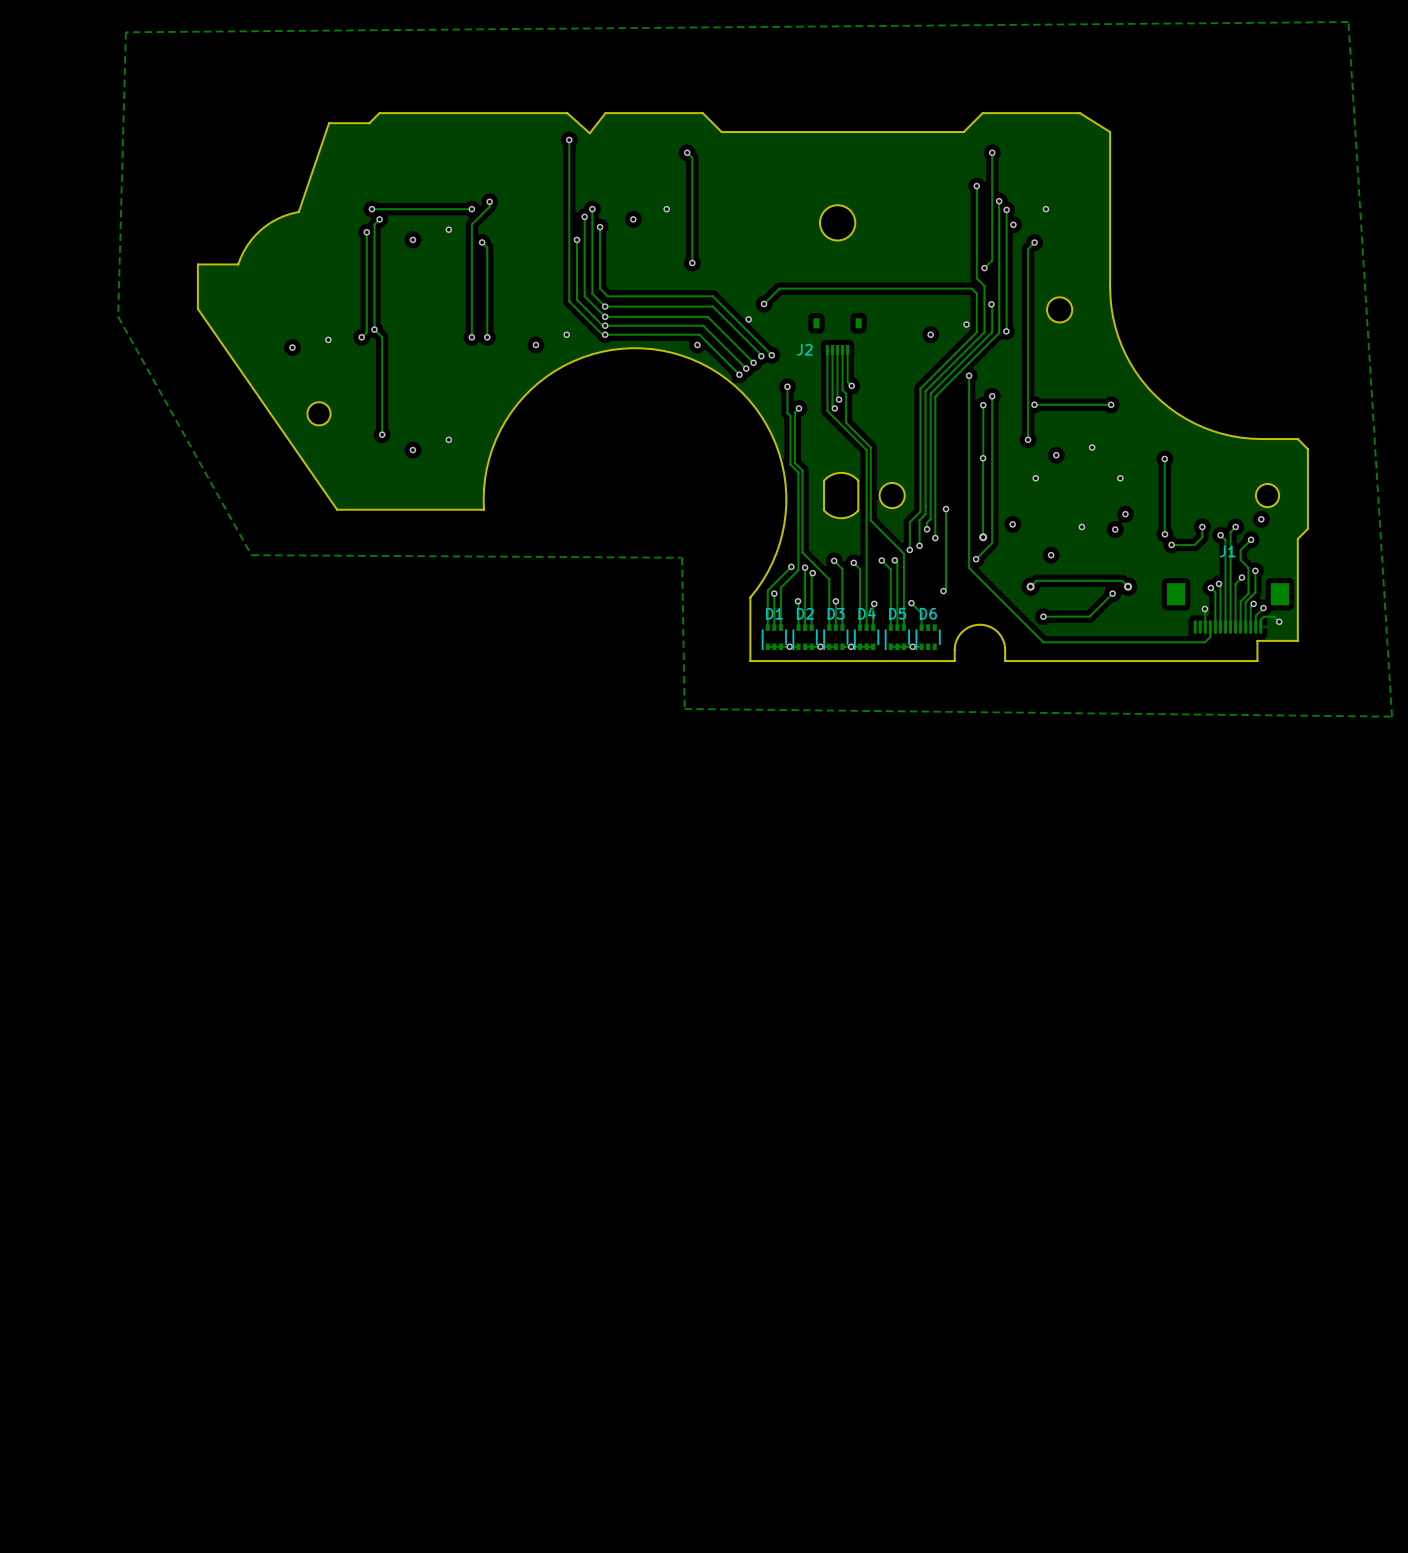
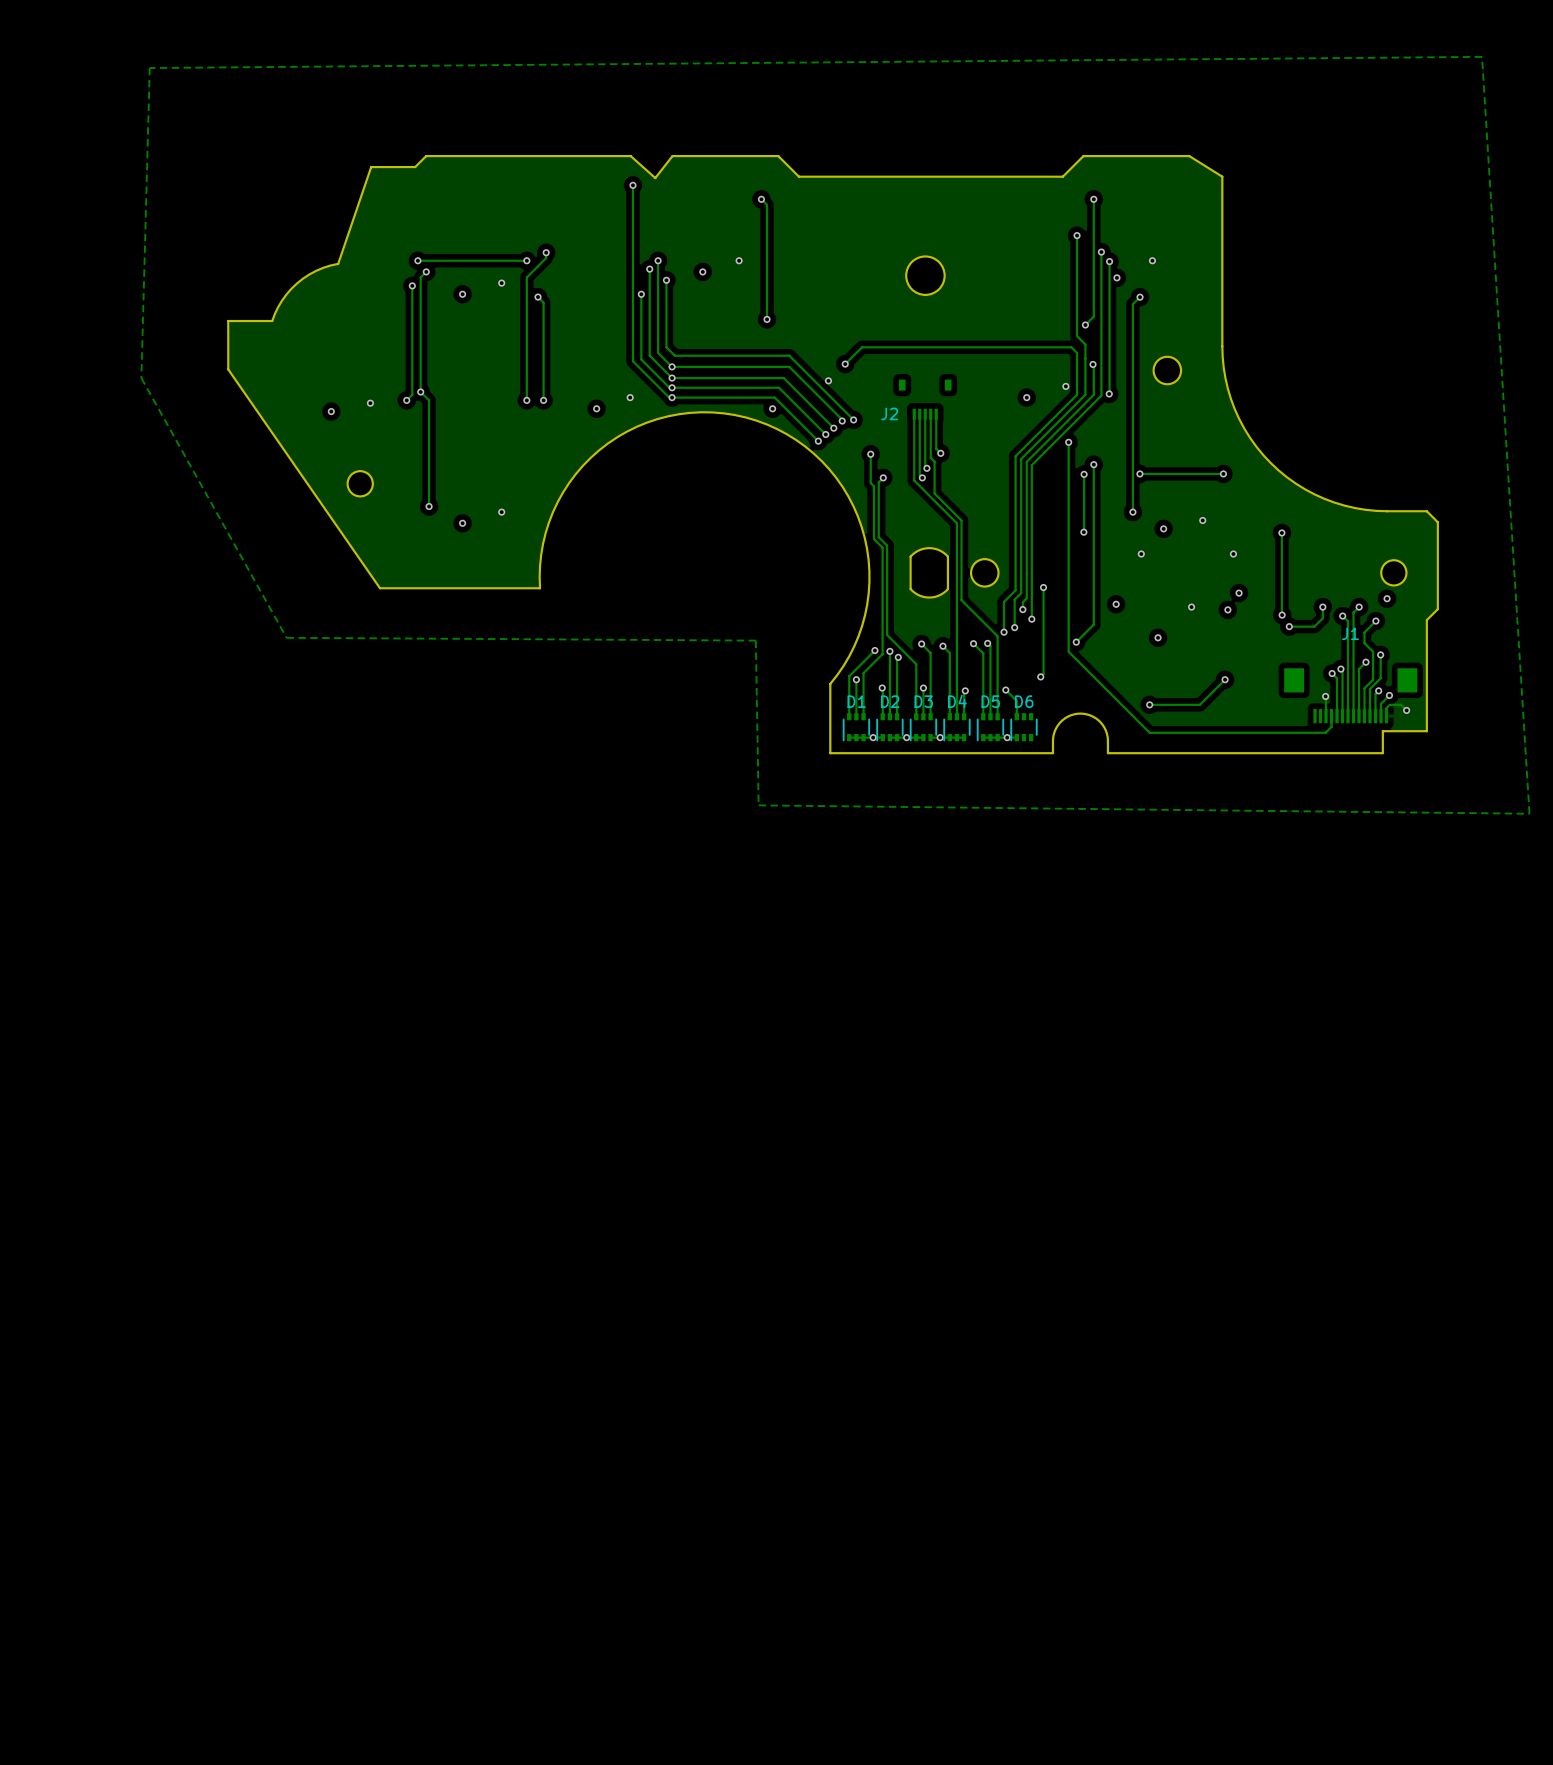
track: (983, 458) (983, 537) -> none
via: (983, 537) -> none
via: (1030, 586) -> none
track: (1128, 586) (1122, 580) (1036, 580) (1030, 586) -> none
via: (1128, 586) -> none

